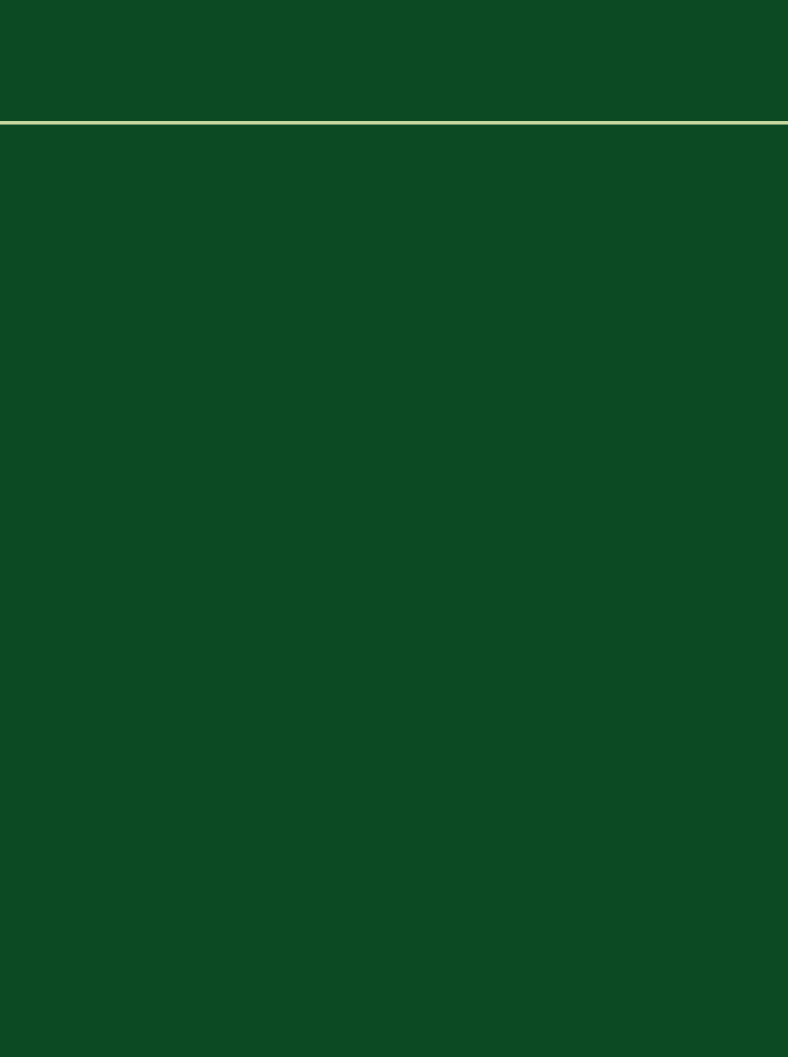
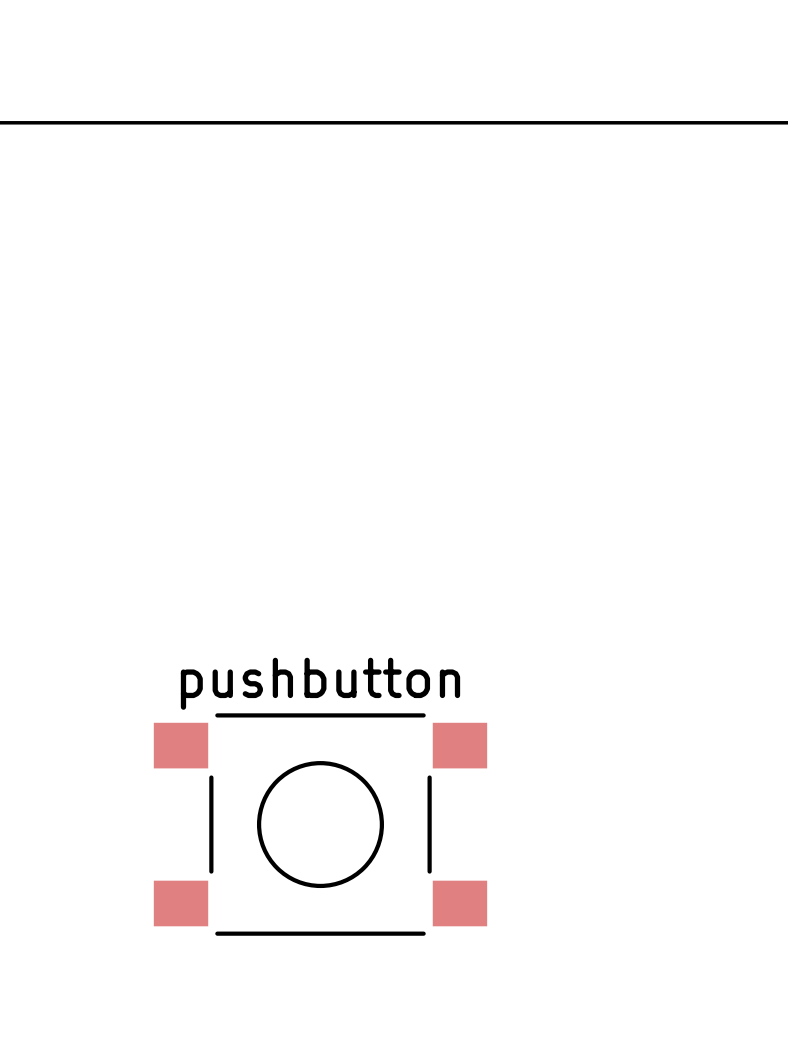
pushbutton: none -> (320, 824)

